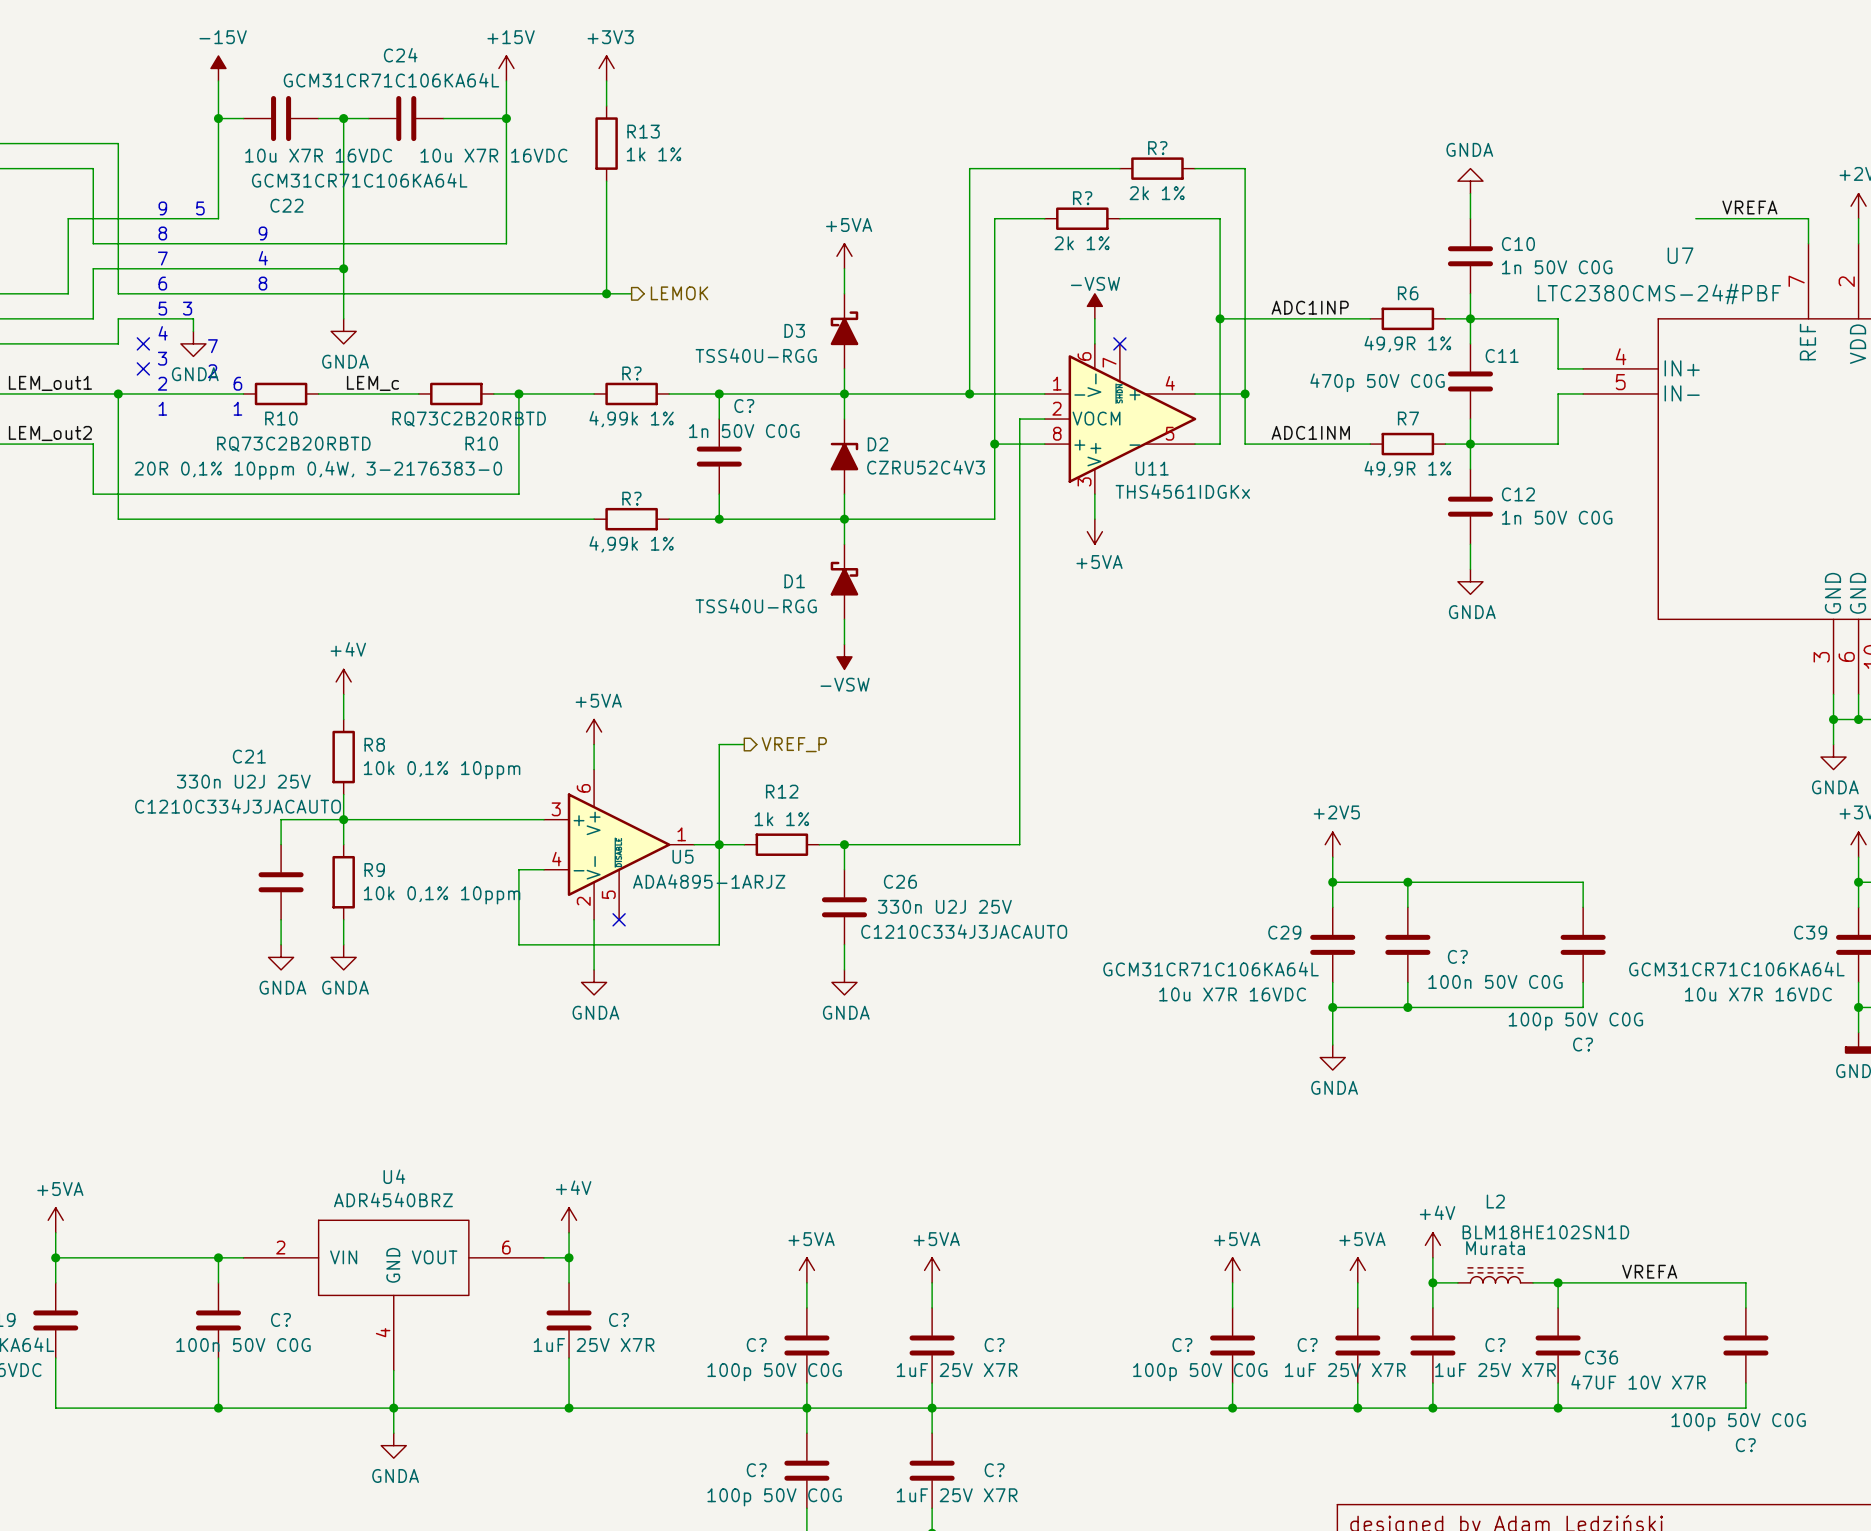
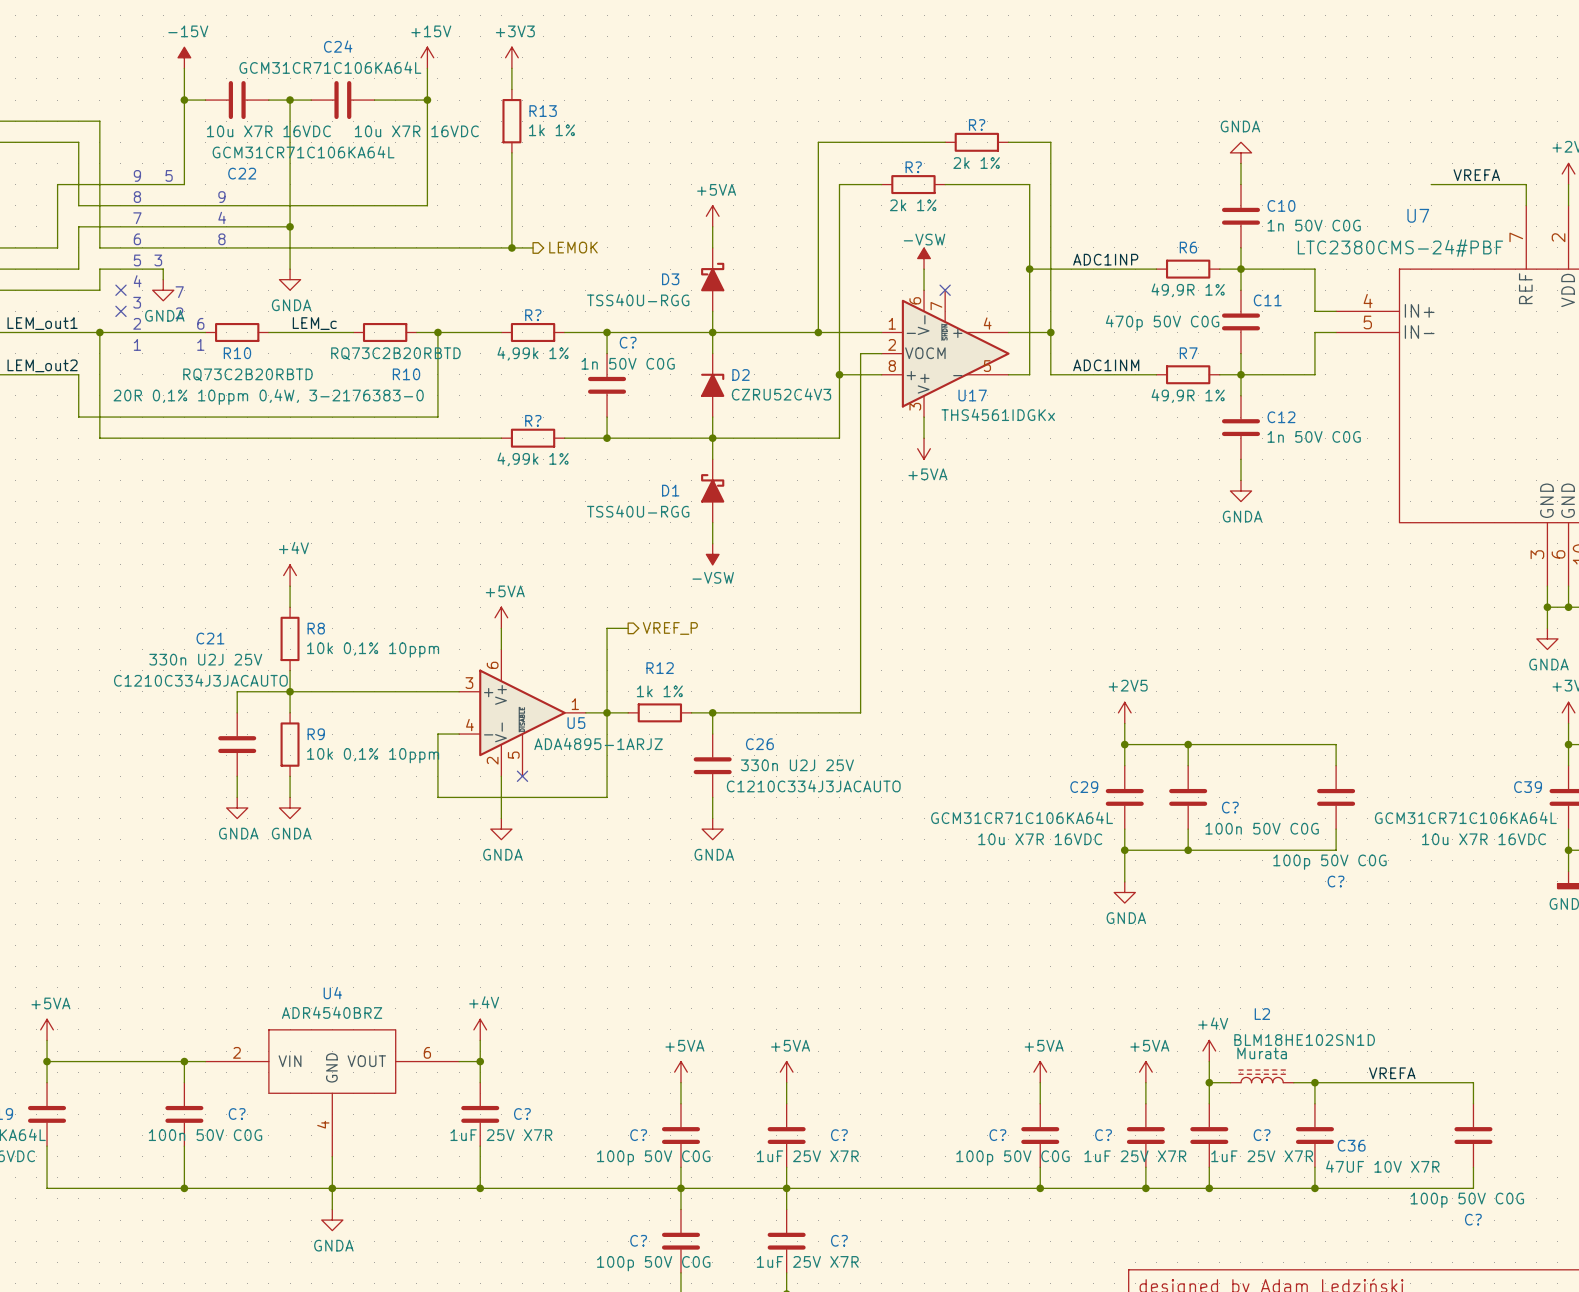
U11 name: U11 (1152, 468) -> U17 (972, 395)

